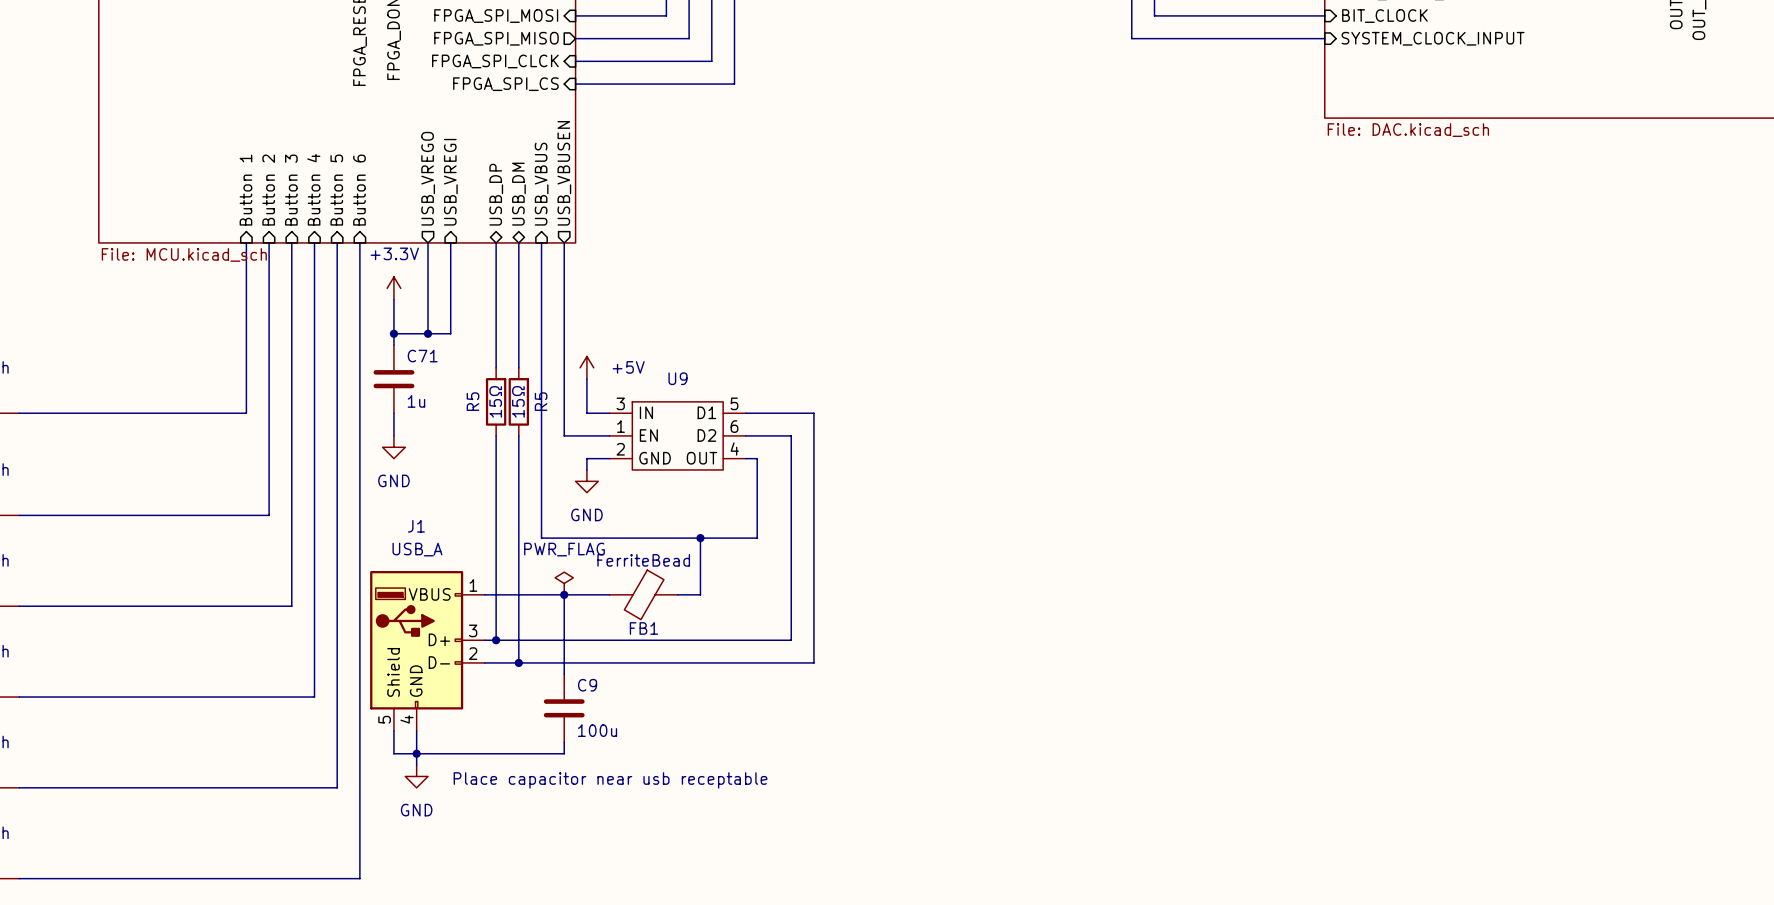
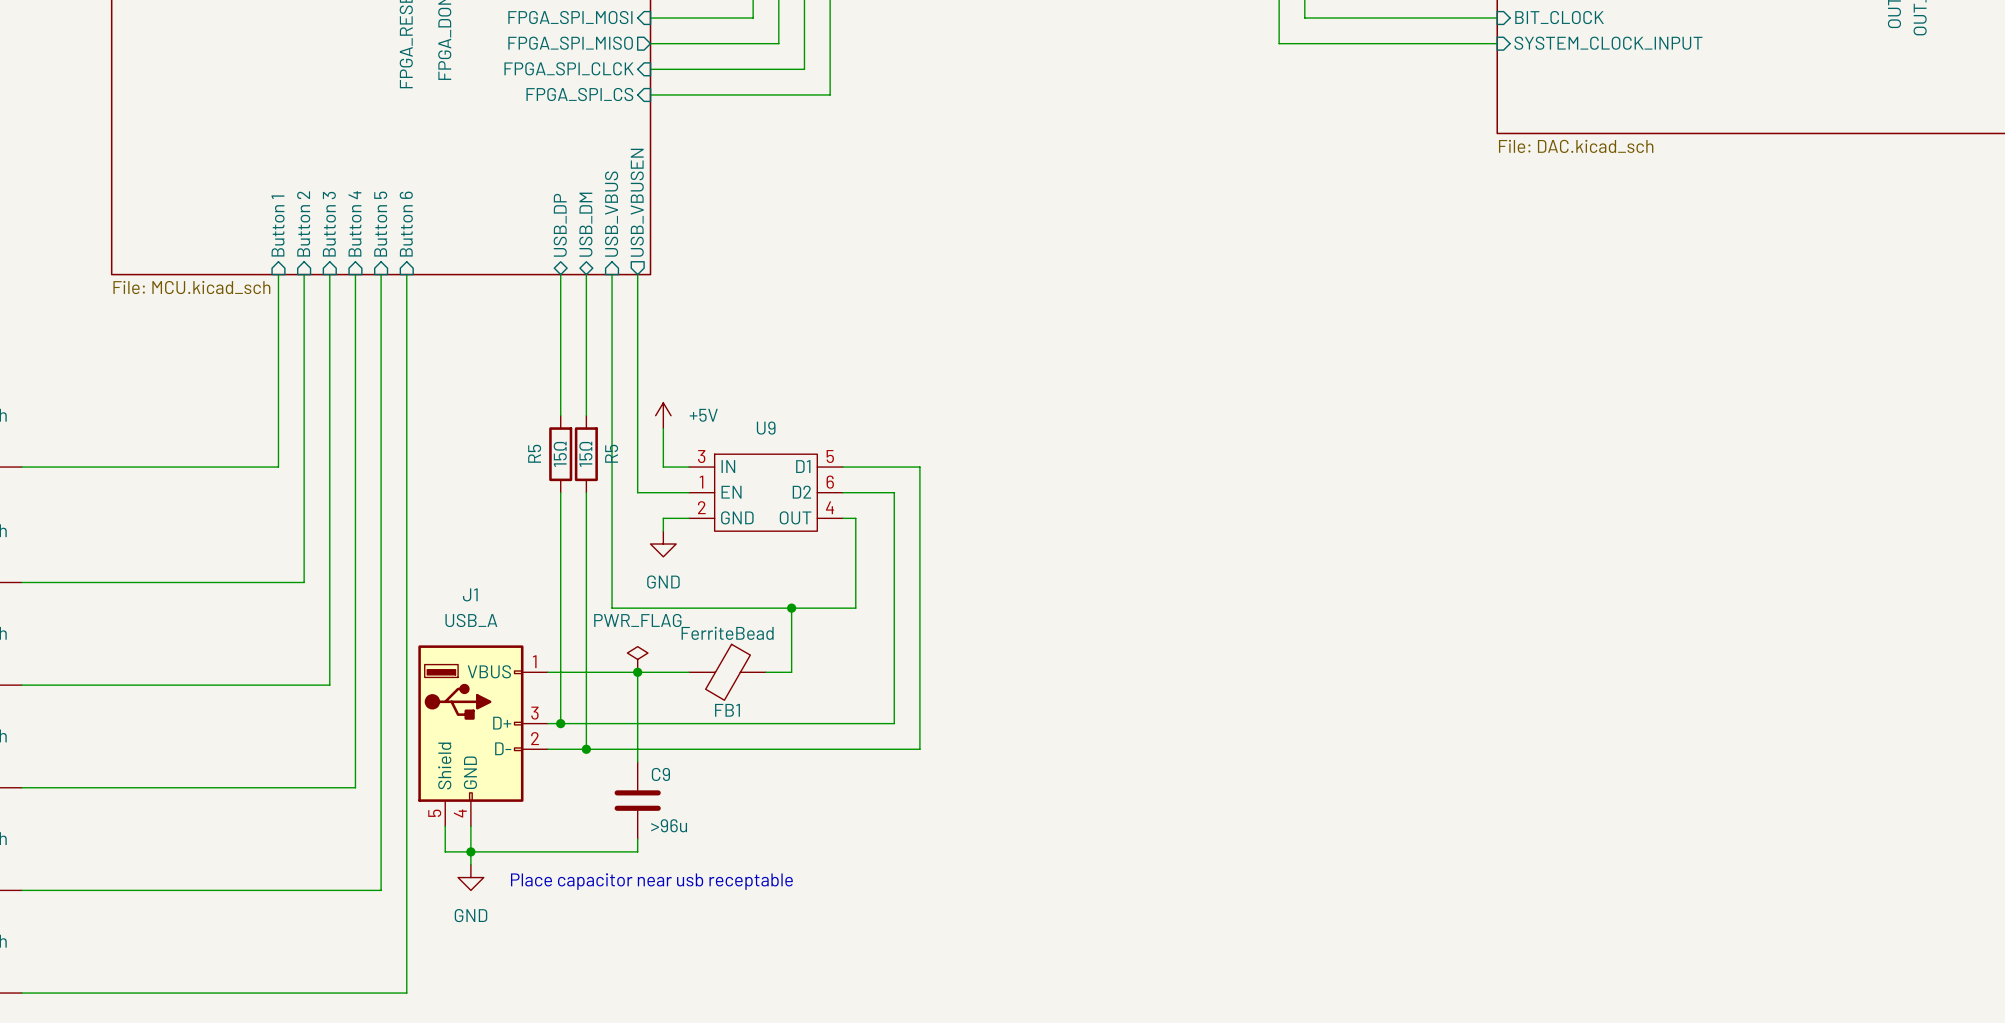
sheet pin: USB_VREGO (428, 178) -> none
sheet pin: USB_VREGI (450, 182) -> none
wire: (428, 242) (428, 333) -> none
wire: (450, 242) (450, 333) (393, 333) -> none
power symbol: +3.3V (393, 288) -> none
wire: (393, 299) (393, 345) -> none
junction: (393, 333) -> none
junction: (428, 333) -> none
C71: 1u (393, 379) -> none
wire: (393, 413) (393, 435) -> none
power symbol: GND (393, 447) -> none
C9 value: 100u (597, 730) -> >96u (669, 825)

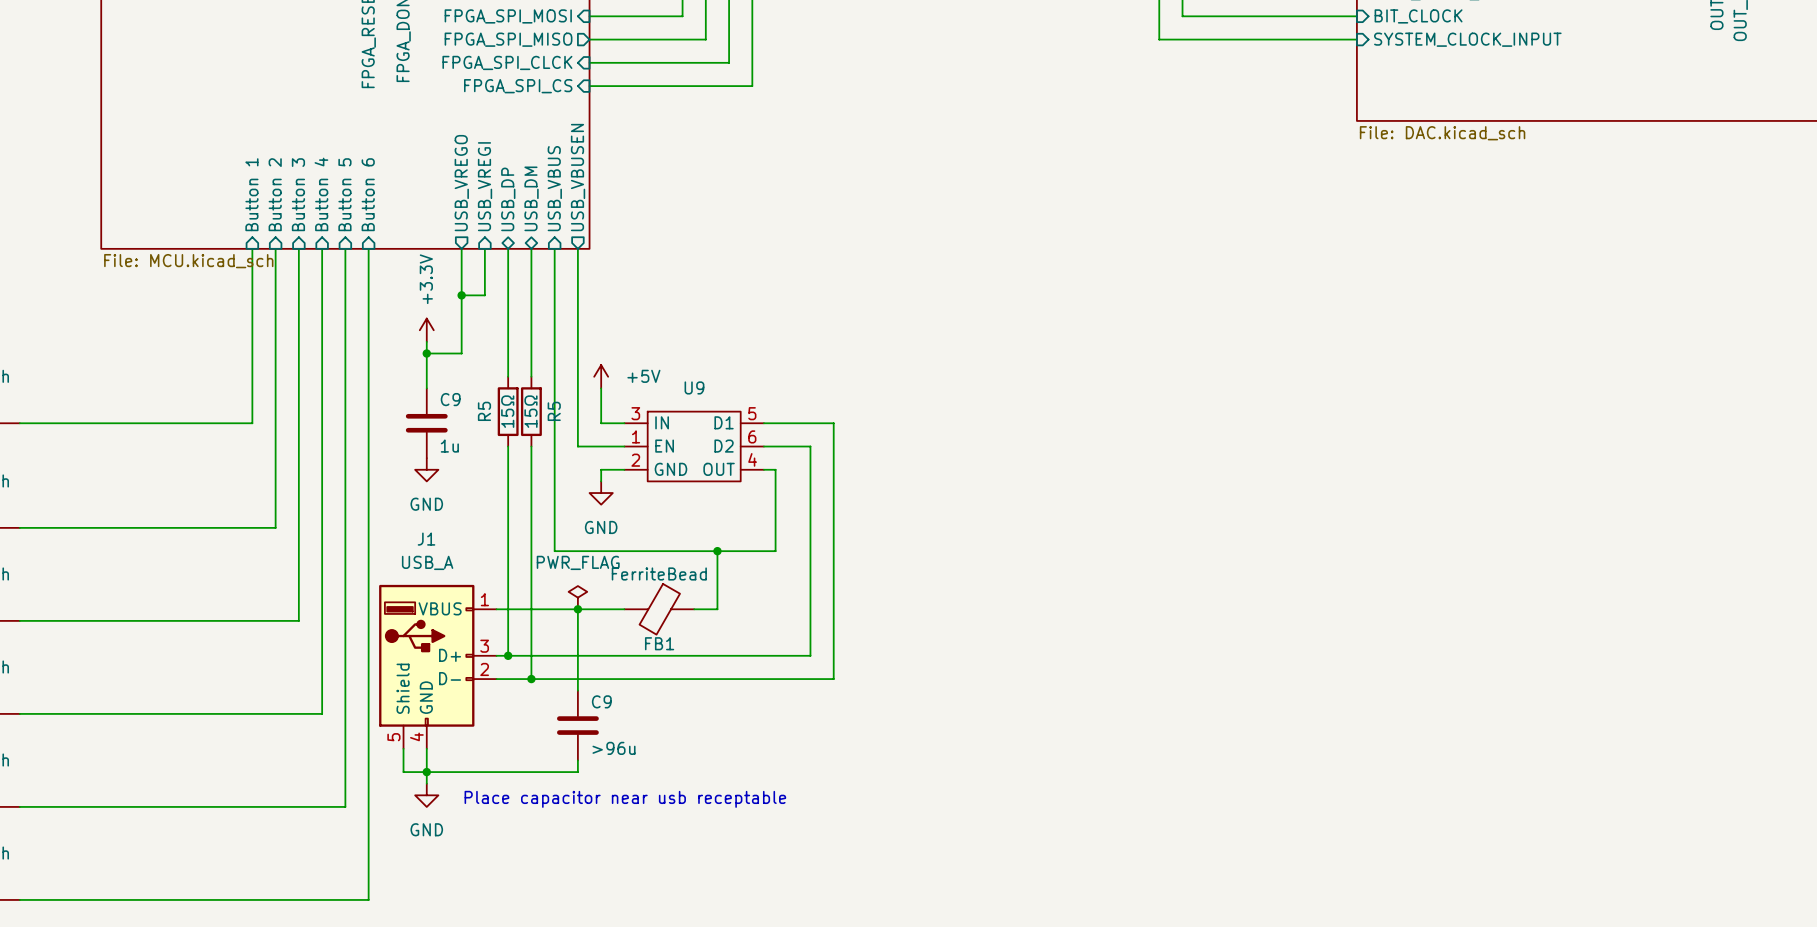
sheet pin: none -> USB_VREGO (461, 183)
sheet pin: none -> USB_VREGI (485, 186)
wire: none -> (461, 248) (461, 353) (426, 353)
wire: none -> (484, 248) (484, 295) (461, 295)
junction: none -> (461, 295)
power symbol: none -> +3.3V (426, 330)
wire: none -> (426, 341) (426, 388)
junction: none -> (426, 353)
C9: none -> 1u (426, 423)
power symbol: none -> GND (426, 469)

